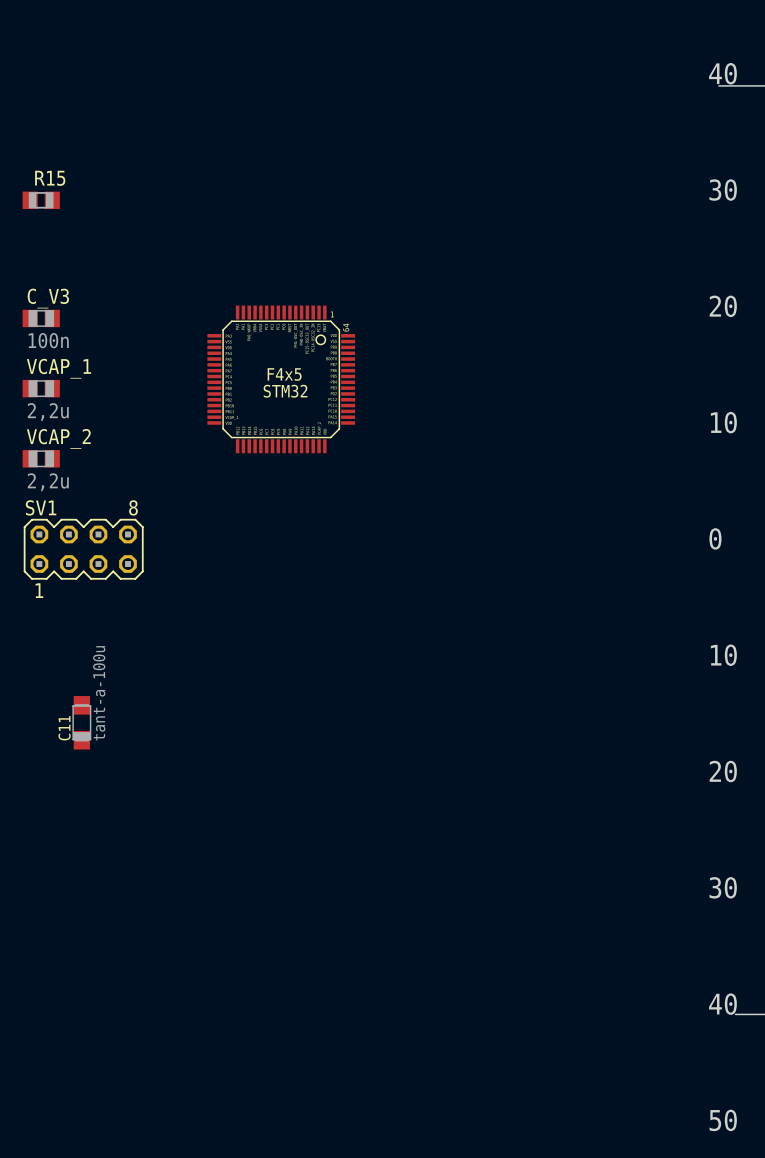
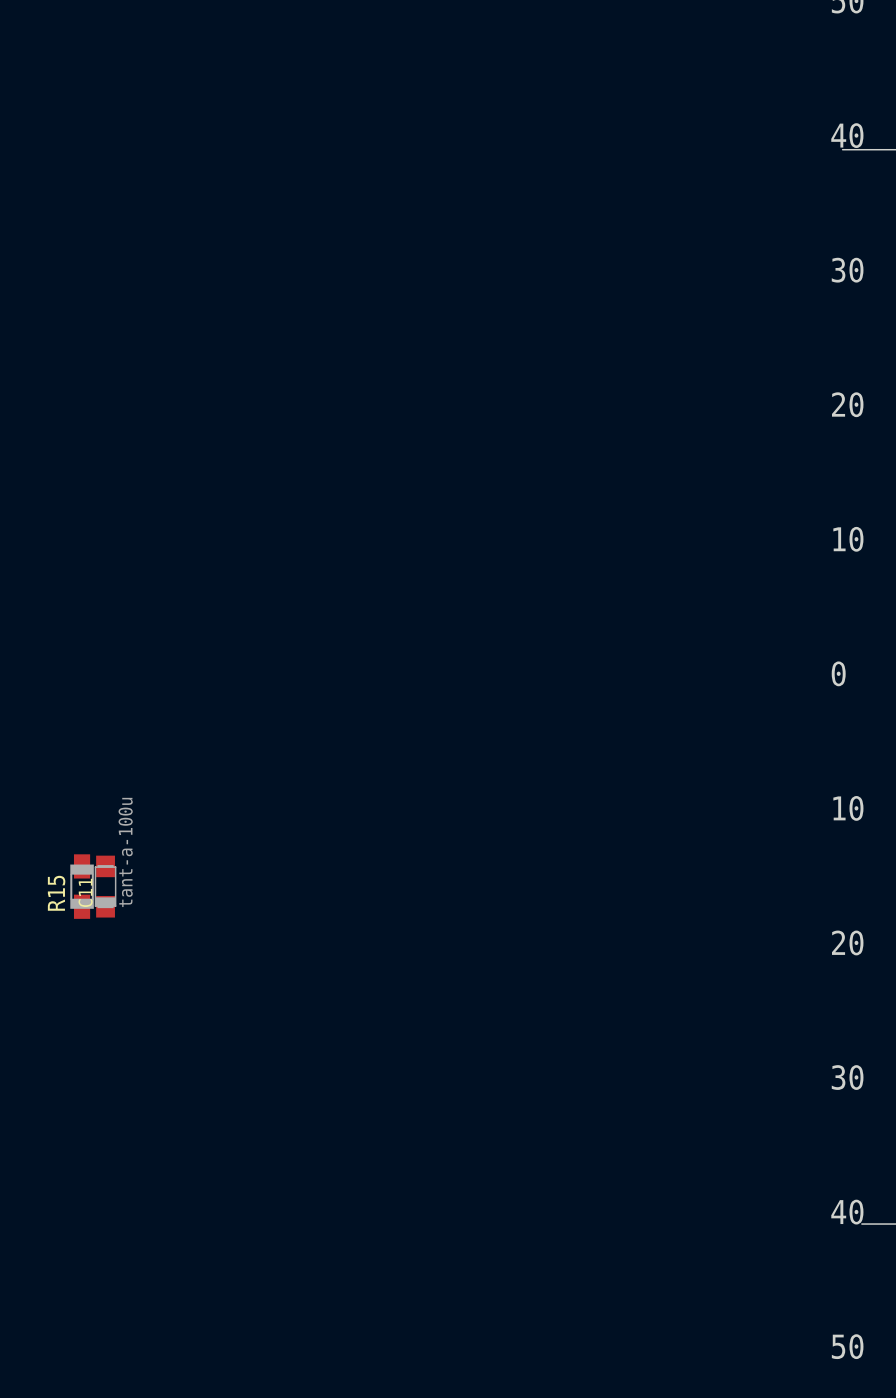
R15 name position: R15 (50, 178) -> R15 (56, 893)
R15 footprint: [22, 191, 60, 210] -> [70, 854, 94, 919]
C_V3: 100n (41, 318) -> none
part: (281, 379) -> none
VCAP_1: 2,2u (41, 388) -> none
VCAP_2: 2,2u (41, 458) -> none
SV1: (83, 549) -> none

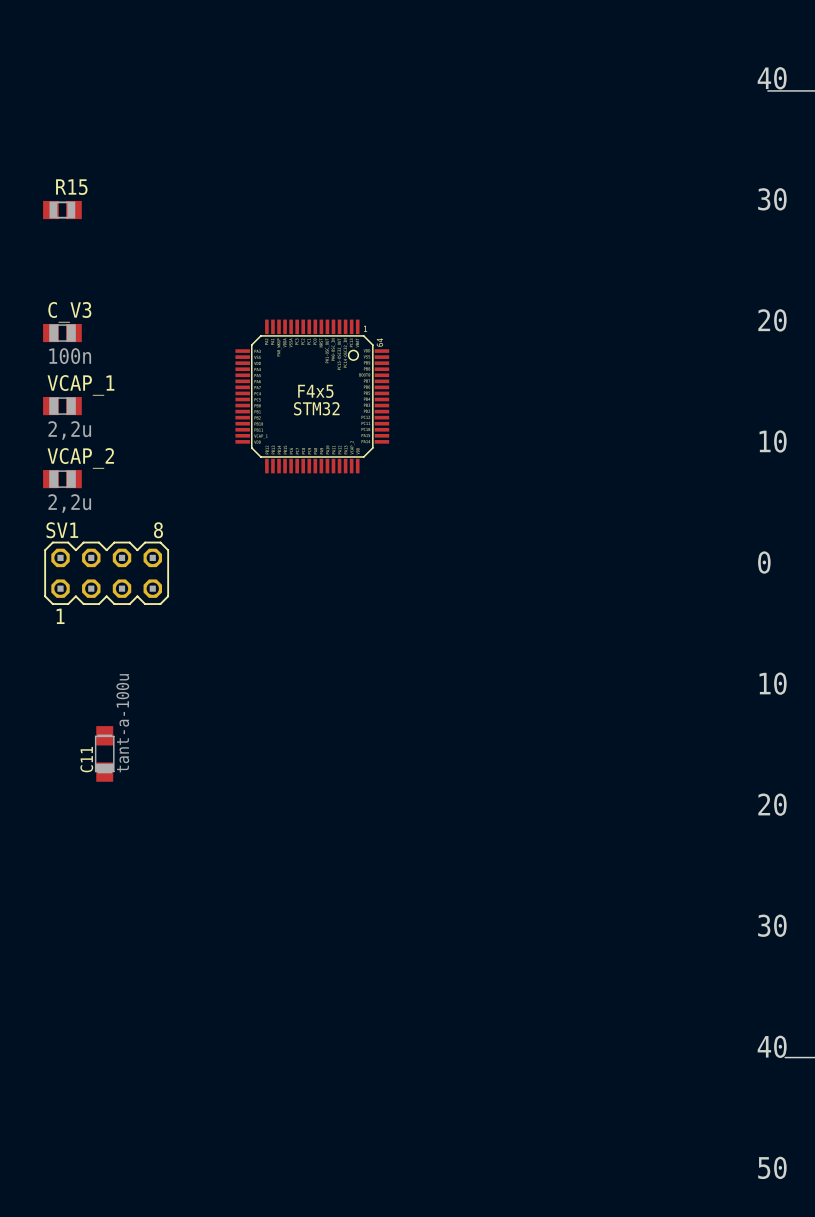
C_V3: none -> 100n (62, 333)
part: none -> (312, 396)
VCAP_1: none -> 2,2u (62, 406)
VCAP_2: none -> 2,2u (62, 479)
SV1: none -> (106, 573)
R15 footprint: [70, 854, 94, 919] -> [43, 200, 82, 220]
R15 name position: R15 (56, 893) -> R15 (71, 187)

